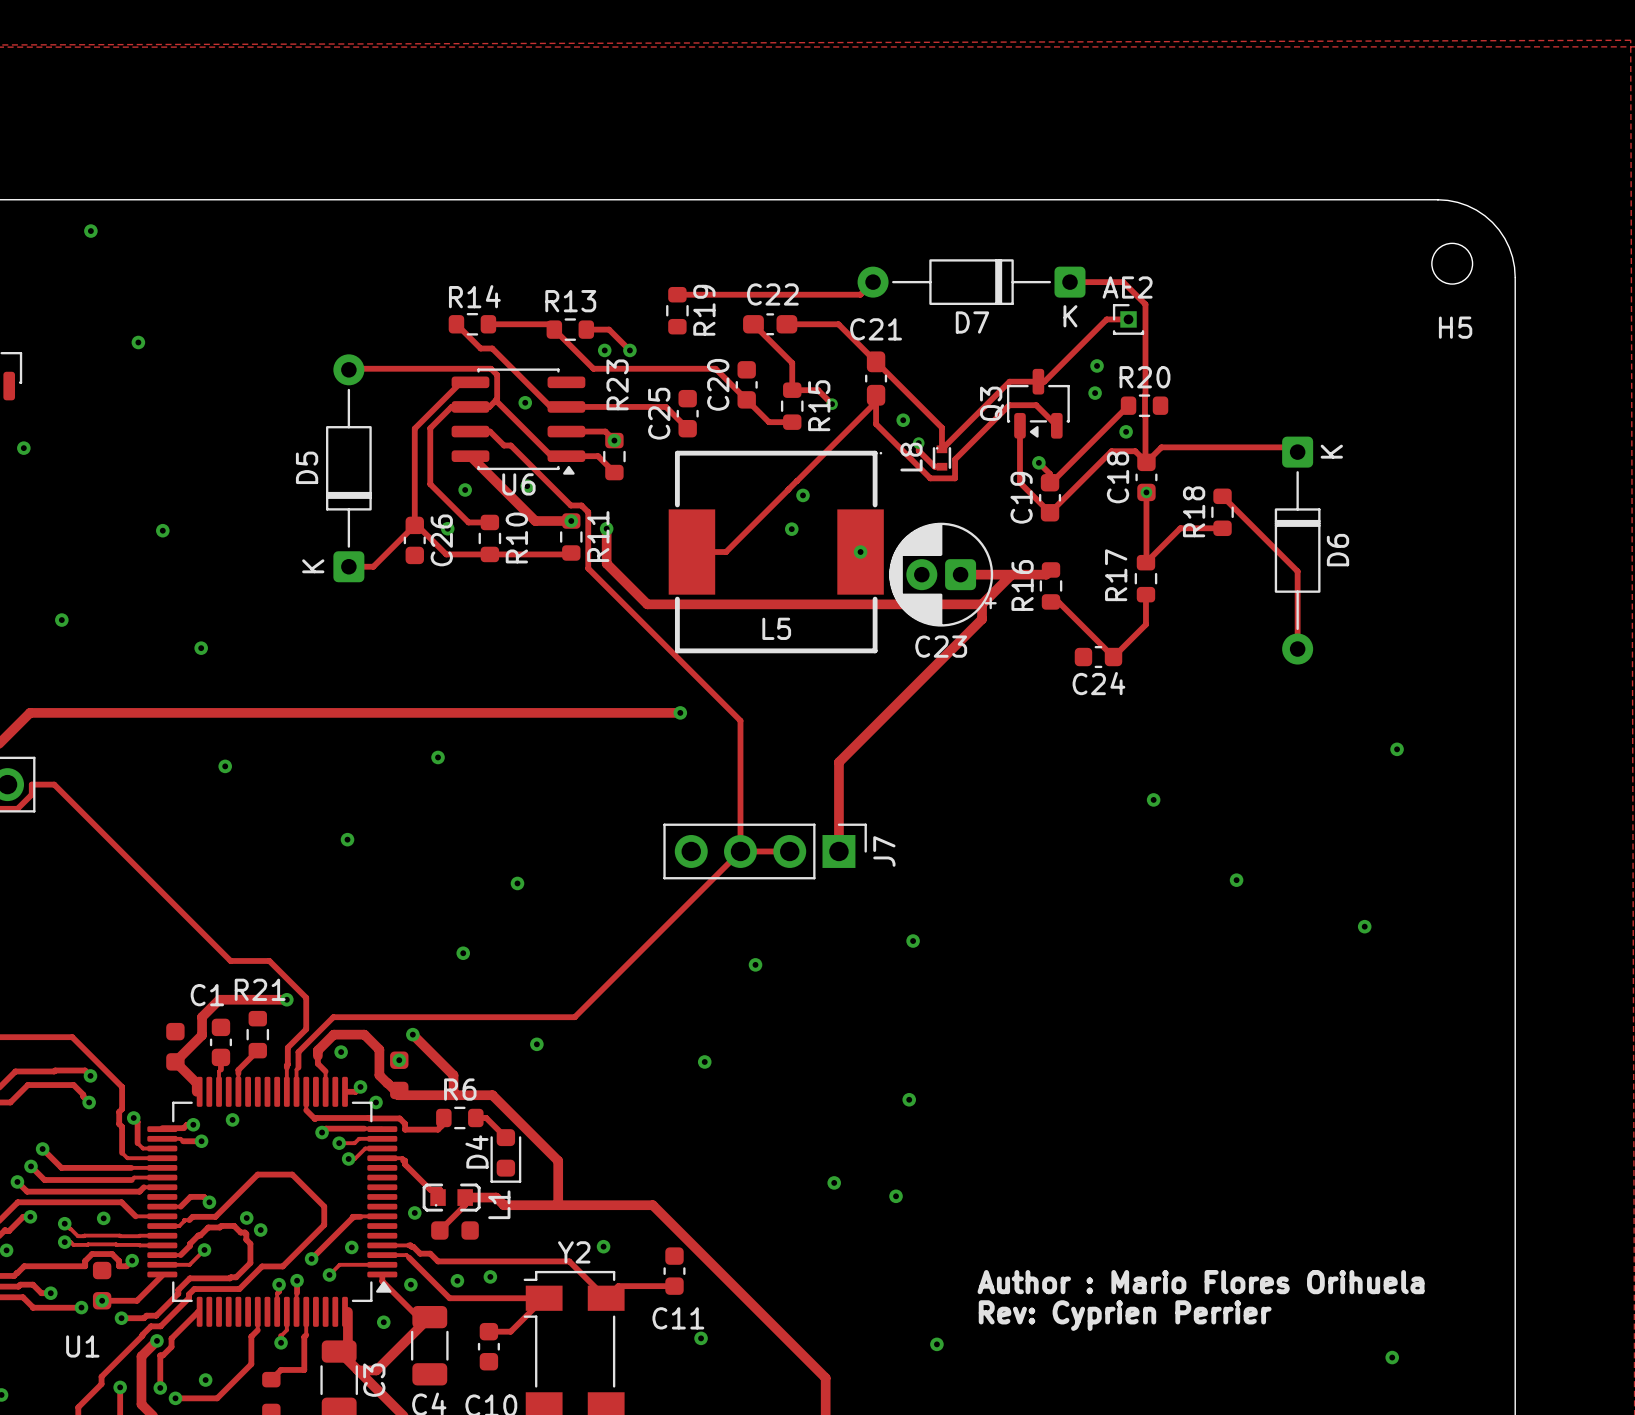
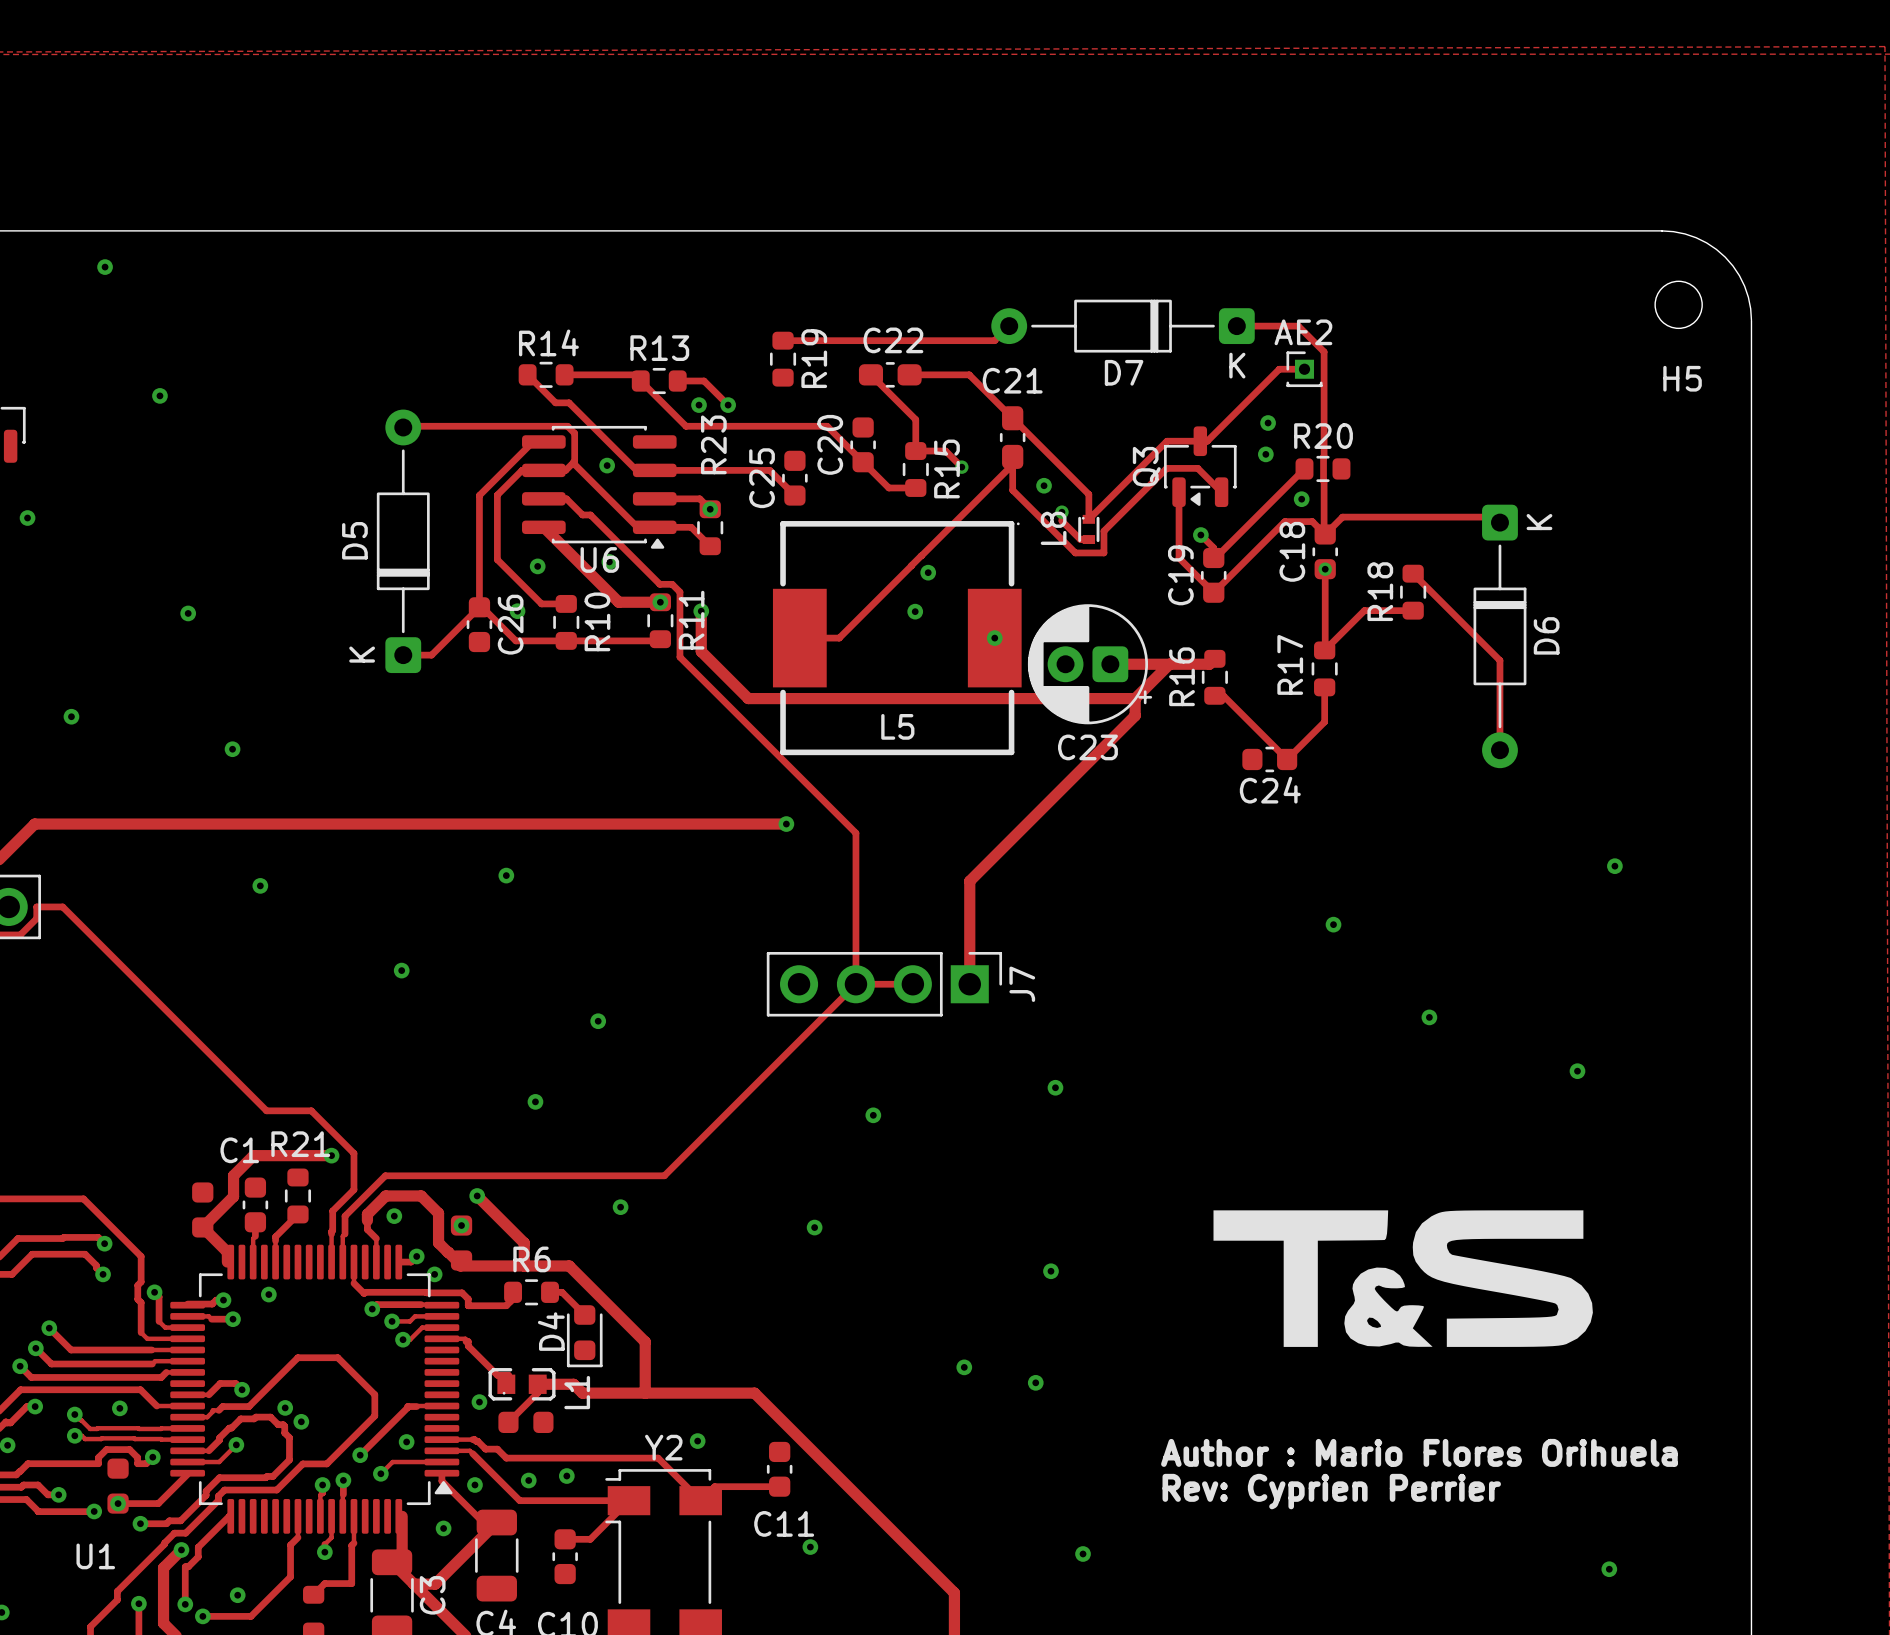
drawing: none -> [1213, 1210, 1593, 1347]
text position: Author : Mario Flores Orihuela (1201, 1282) -> Author : Mario Flores Orihuela (1419, 1452)
text position: Rev: Cyprien Perrier (1125, 1315) -> Rev: Cyprien Perrier (1331, 1491)

